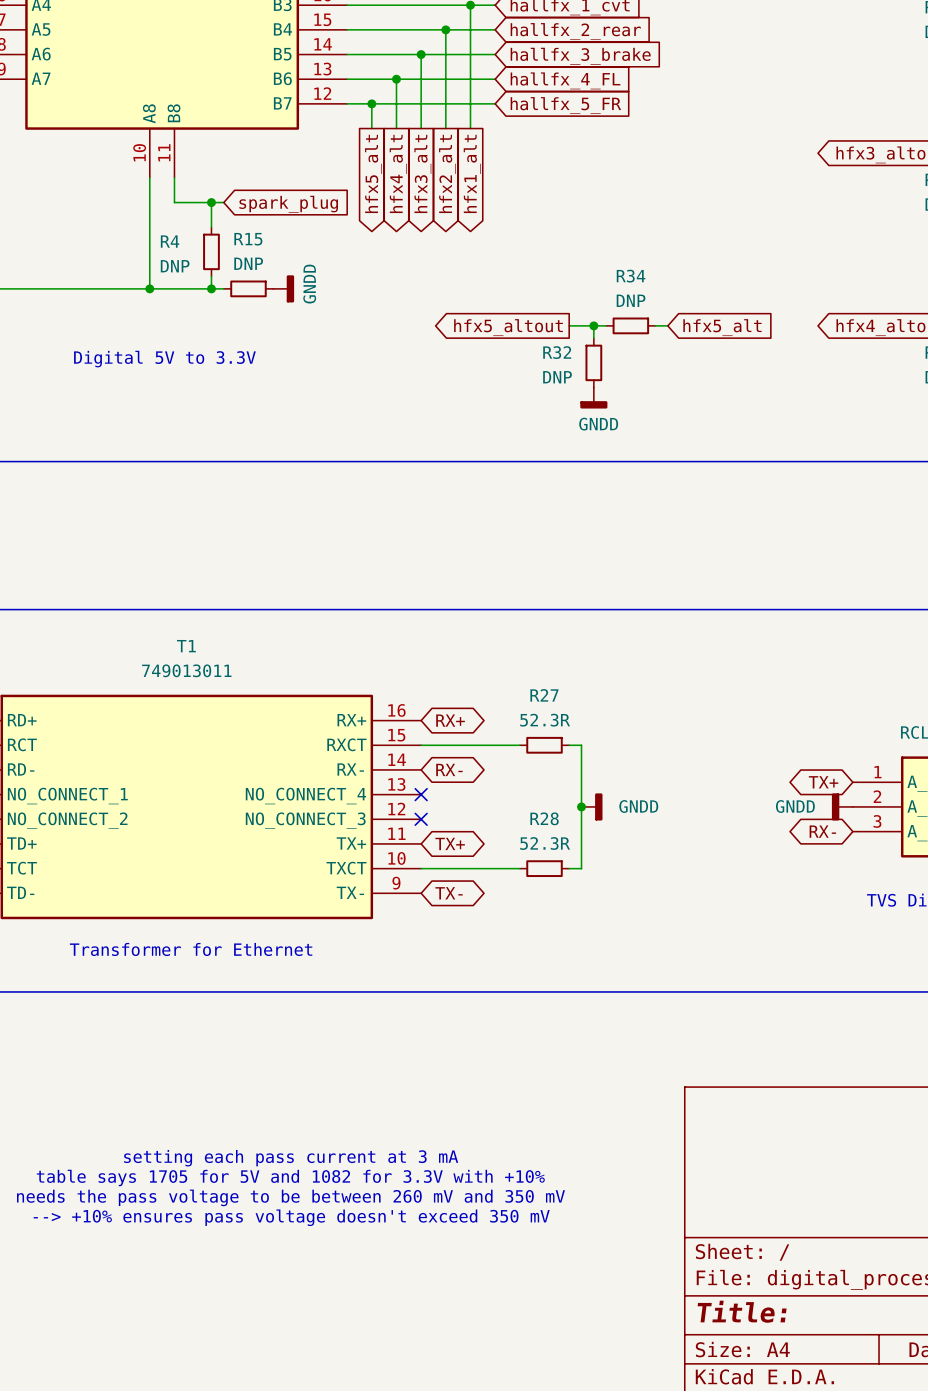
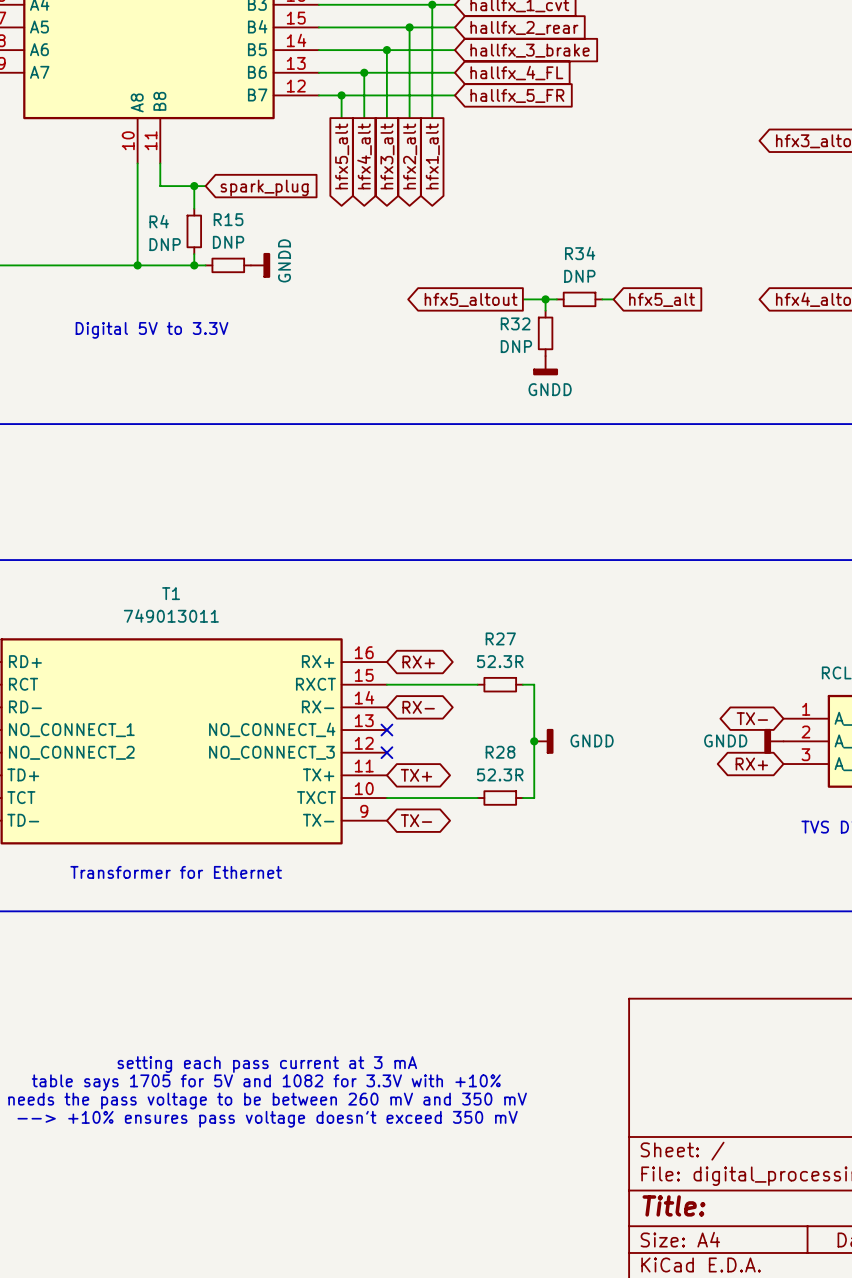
global label: TX+ (823, 782) -> TX- (752, 718)
global label: RX- (822, 831) -> RX+ (751, 764)

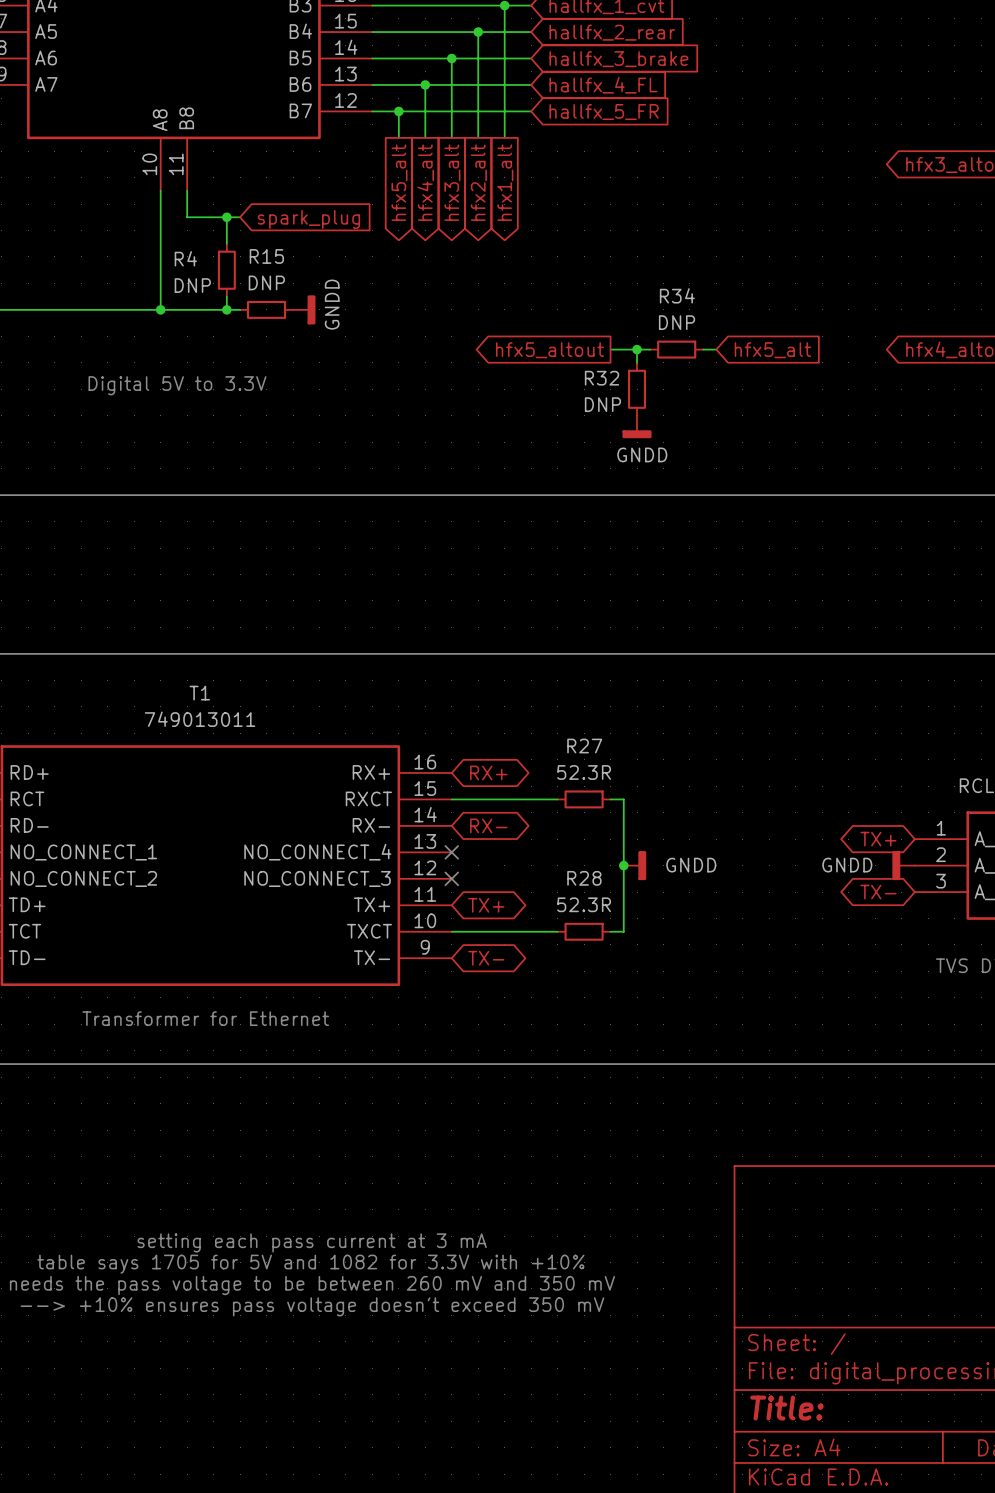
global label: TX- (752, 718) -> TX+ (878, 839)
global label: RX+ (751, 764) -> TX- (878, 892)

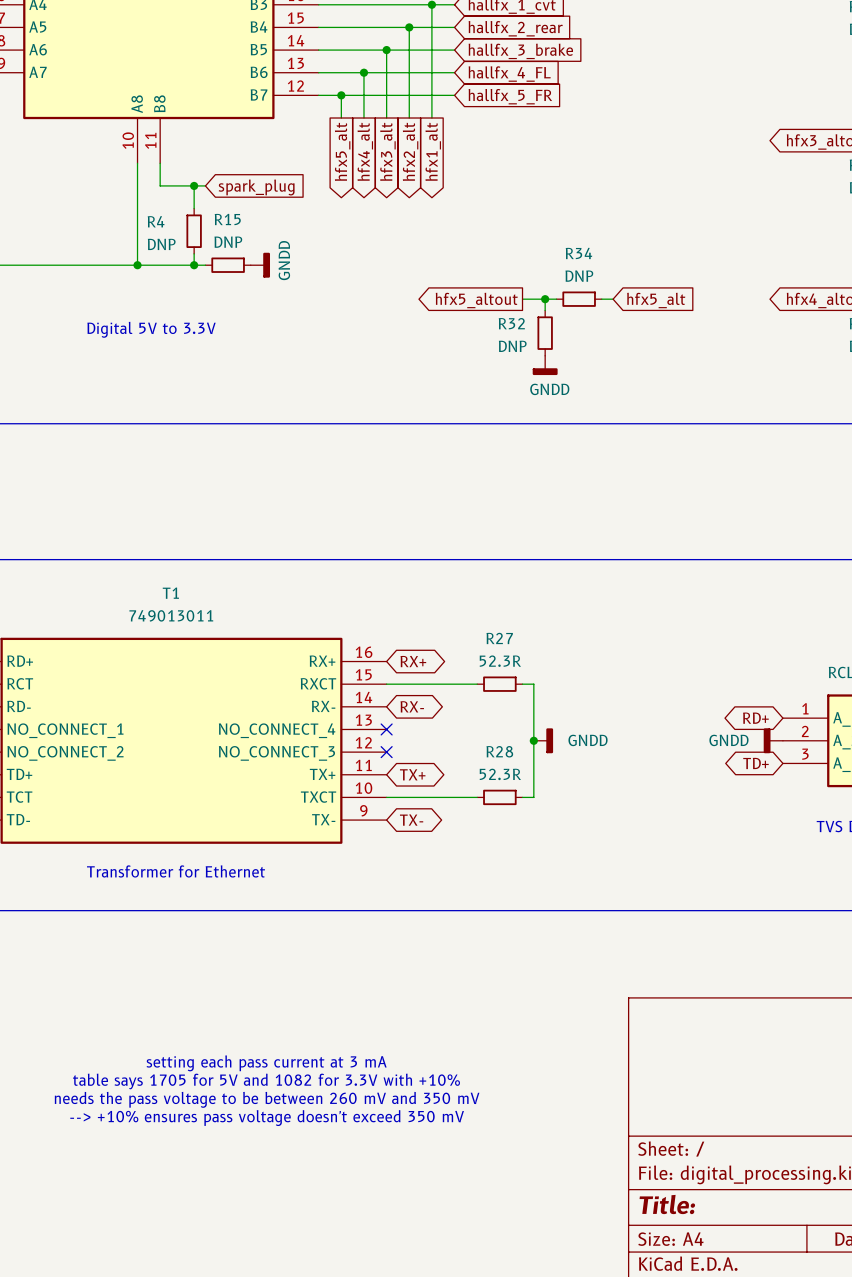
global label: TX+ (878, 839) -> RD+ (755, 718)
global label: TX- (878, 892) -> TD+ (755, 763)

